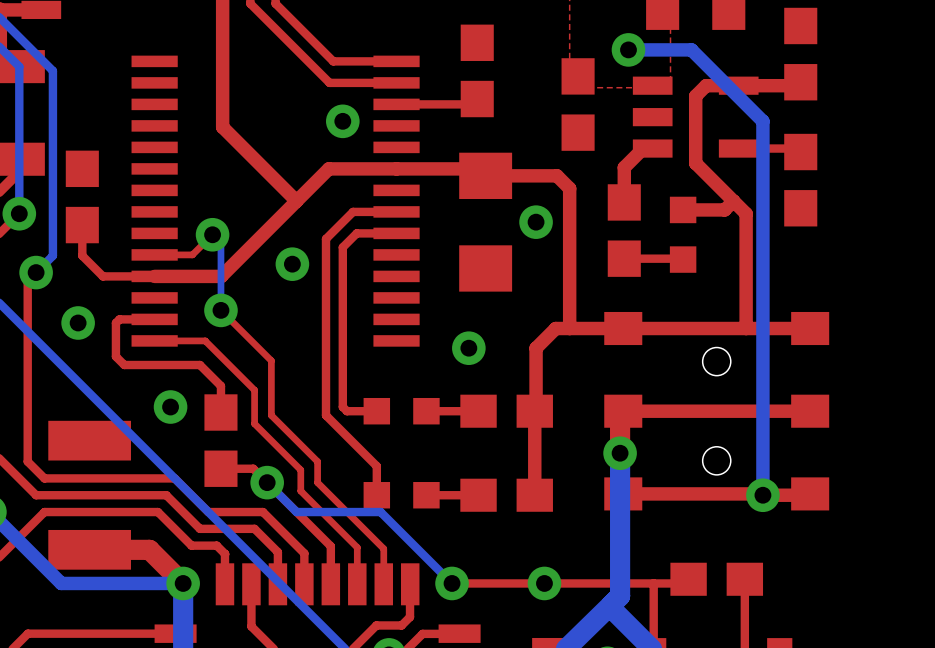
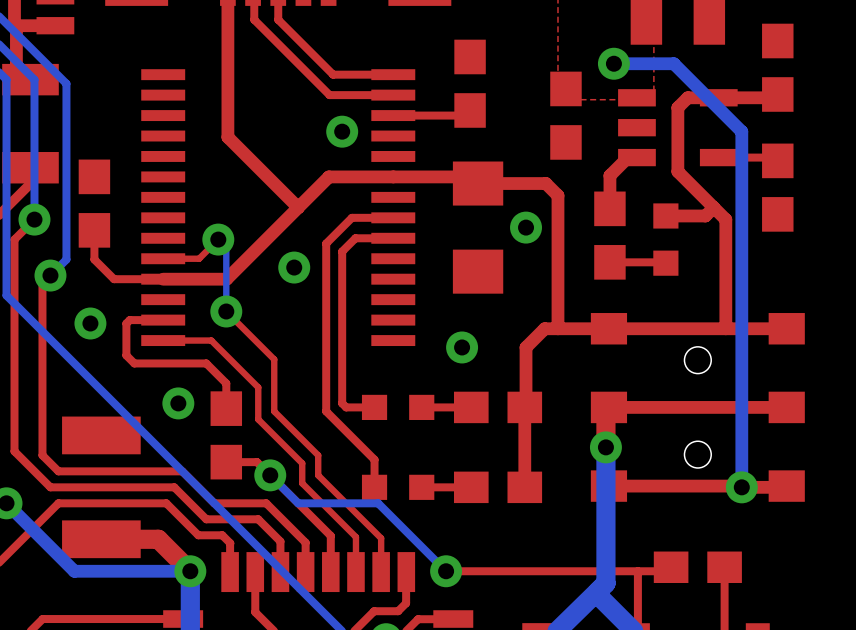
via: (544, 583) -> none

